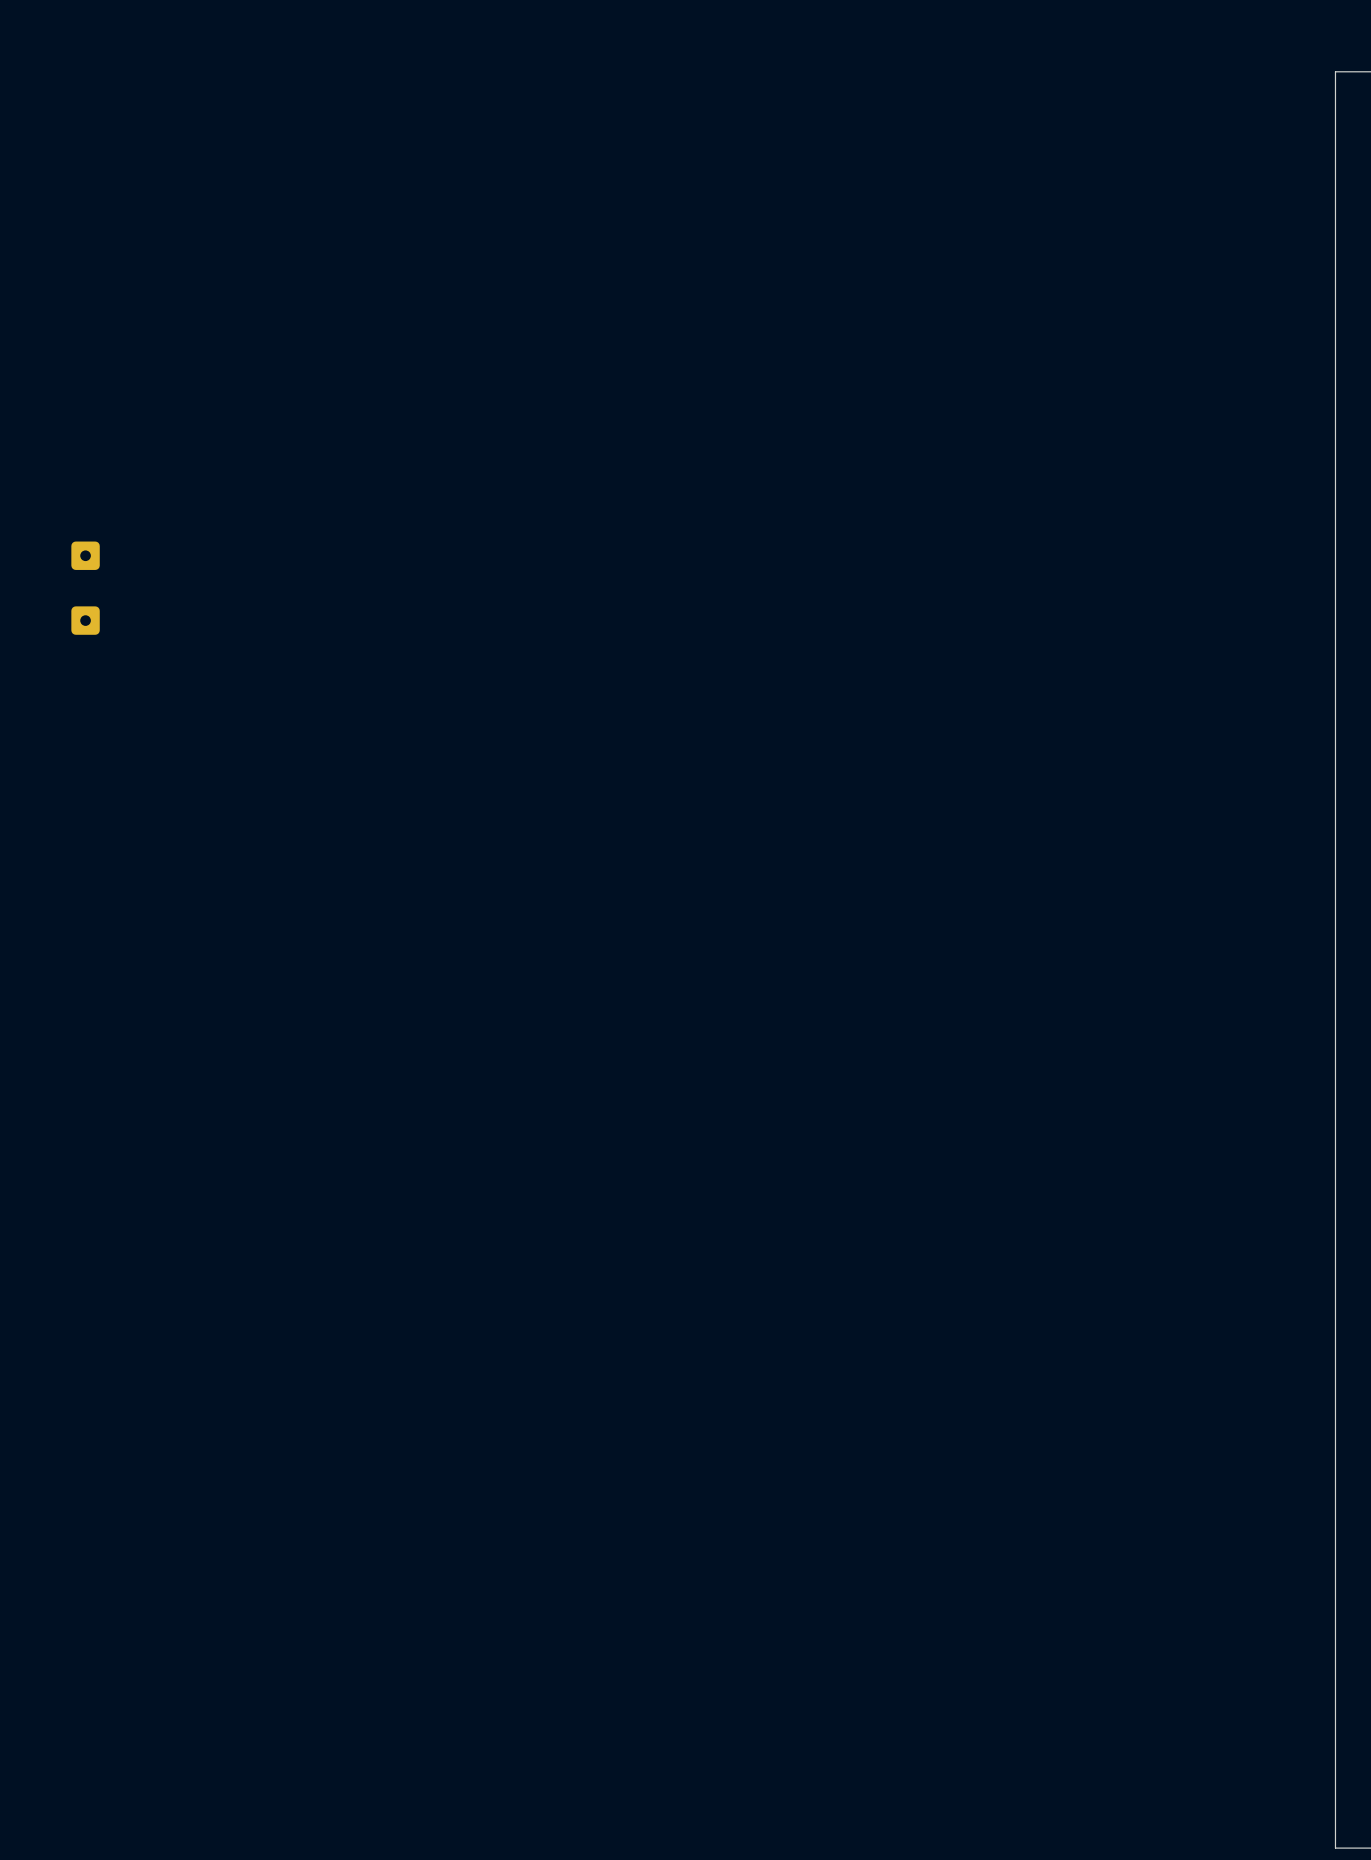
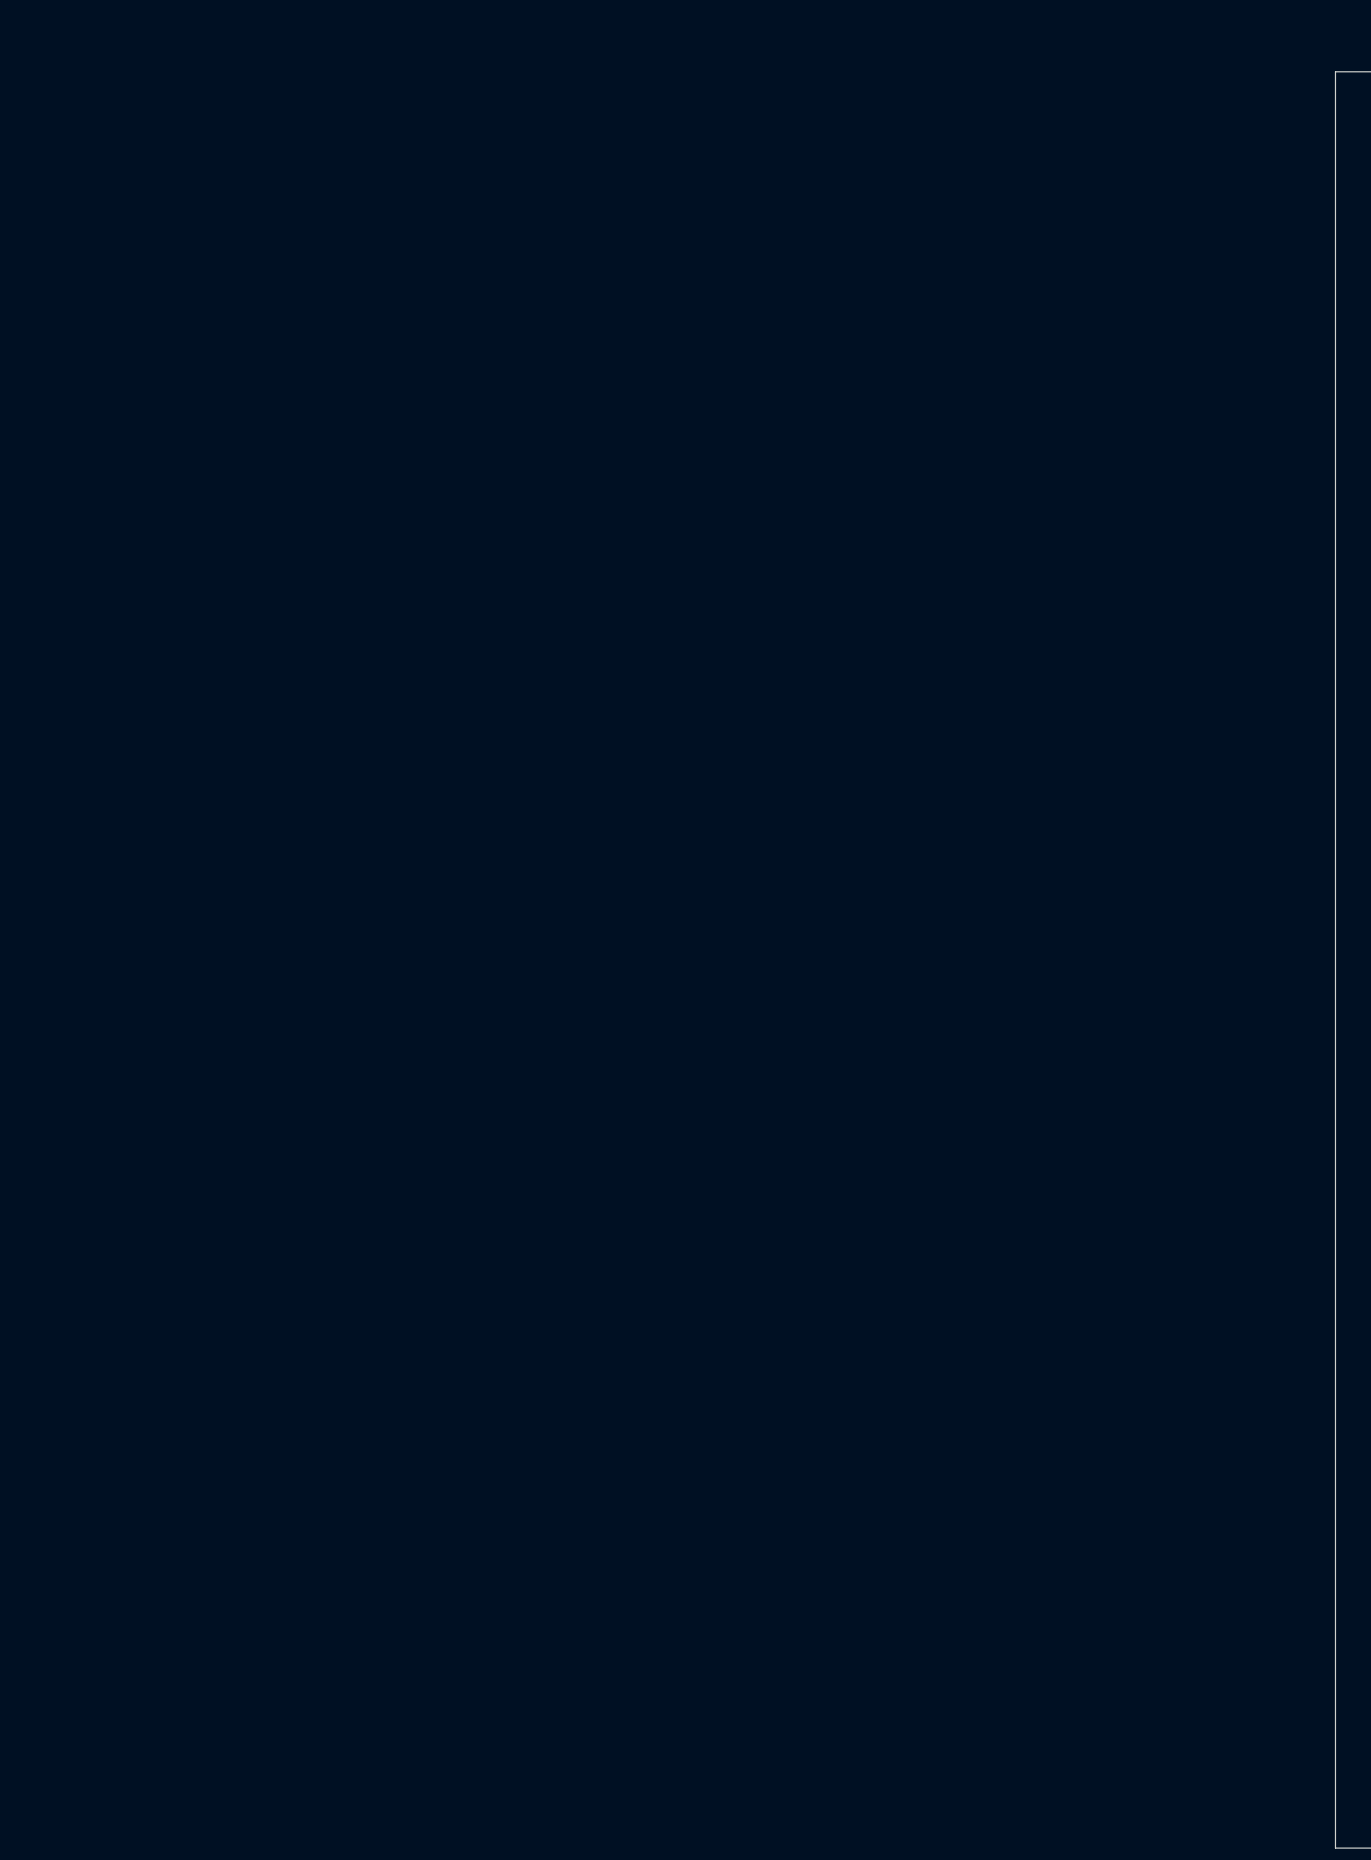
part: (85, 555) -> none
part: (85, 620) -> none

